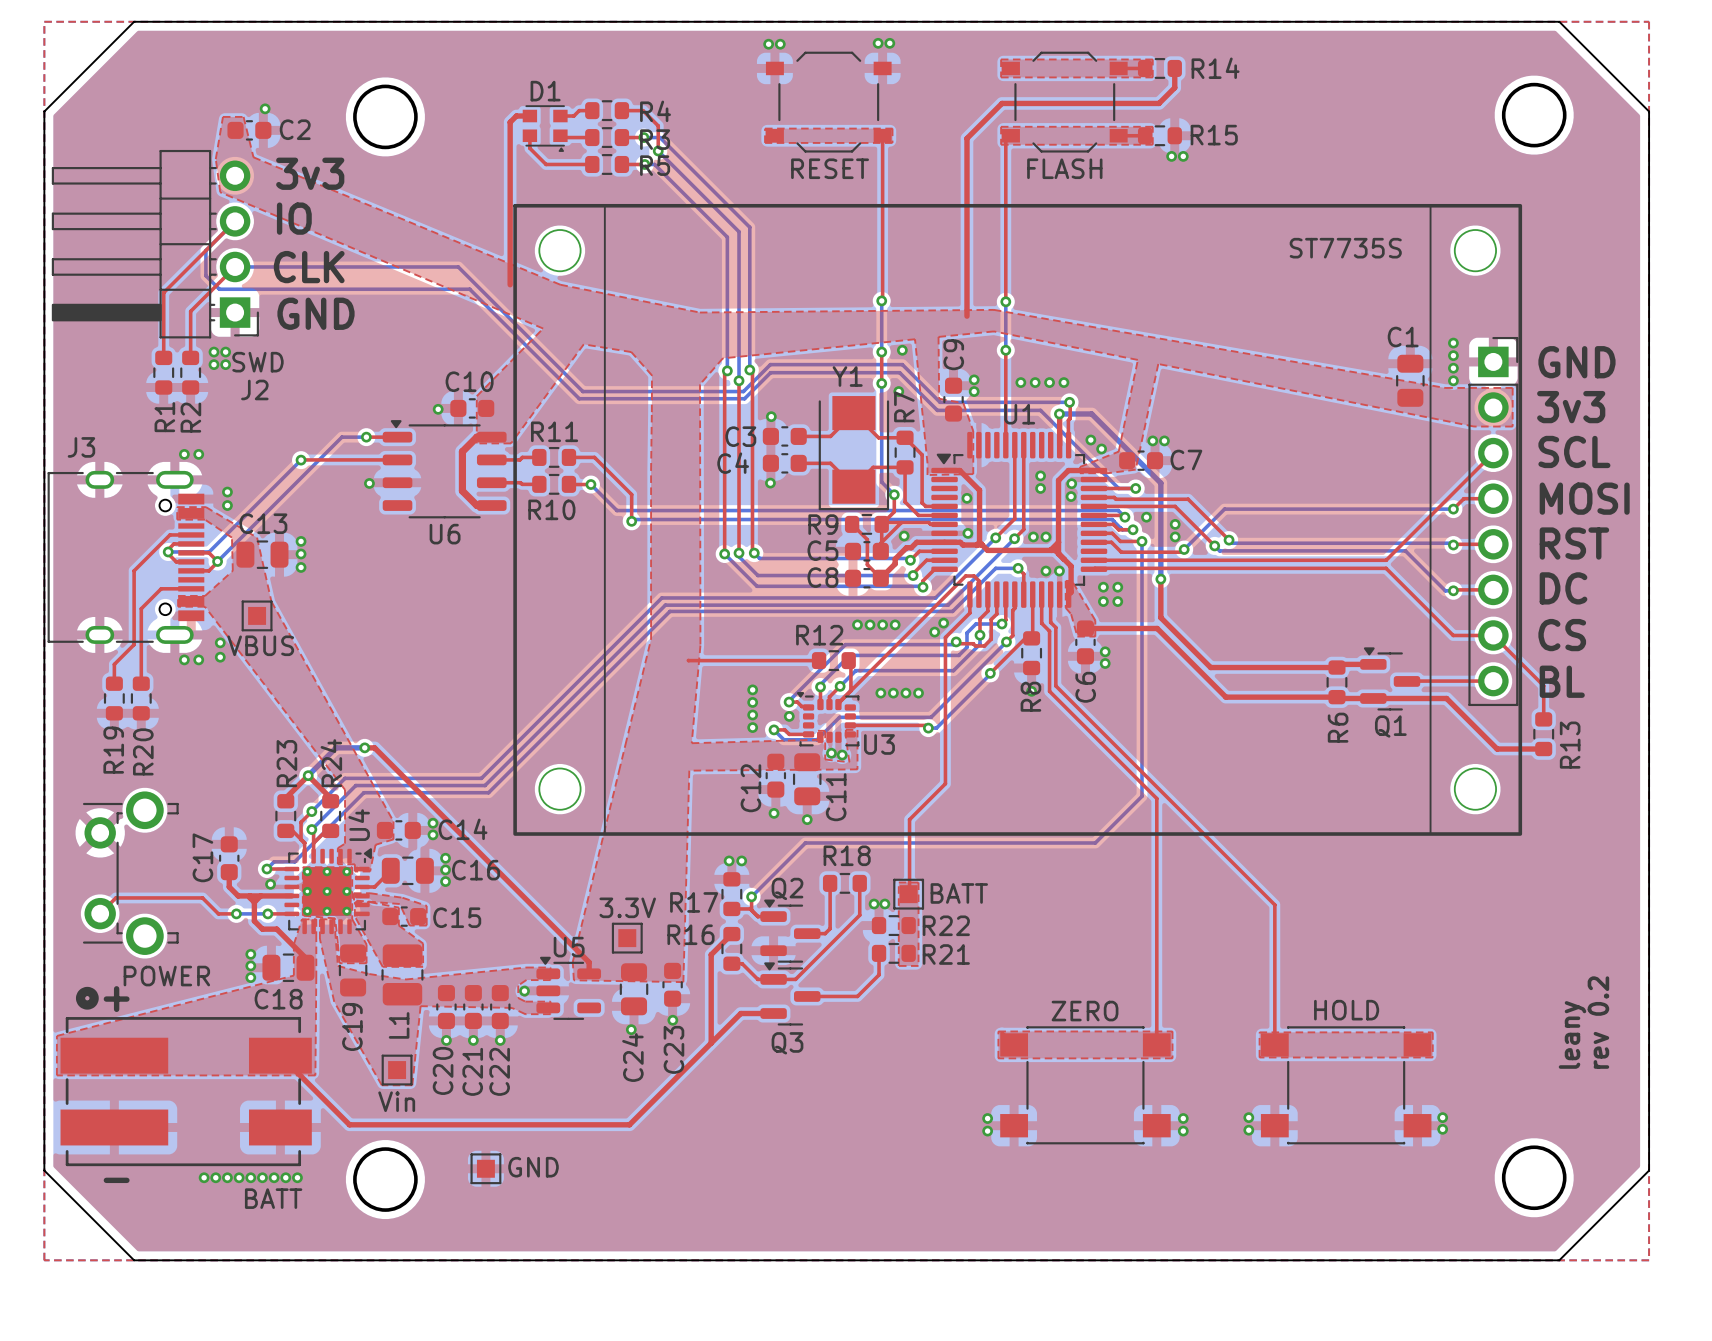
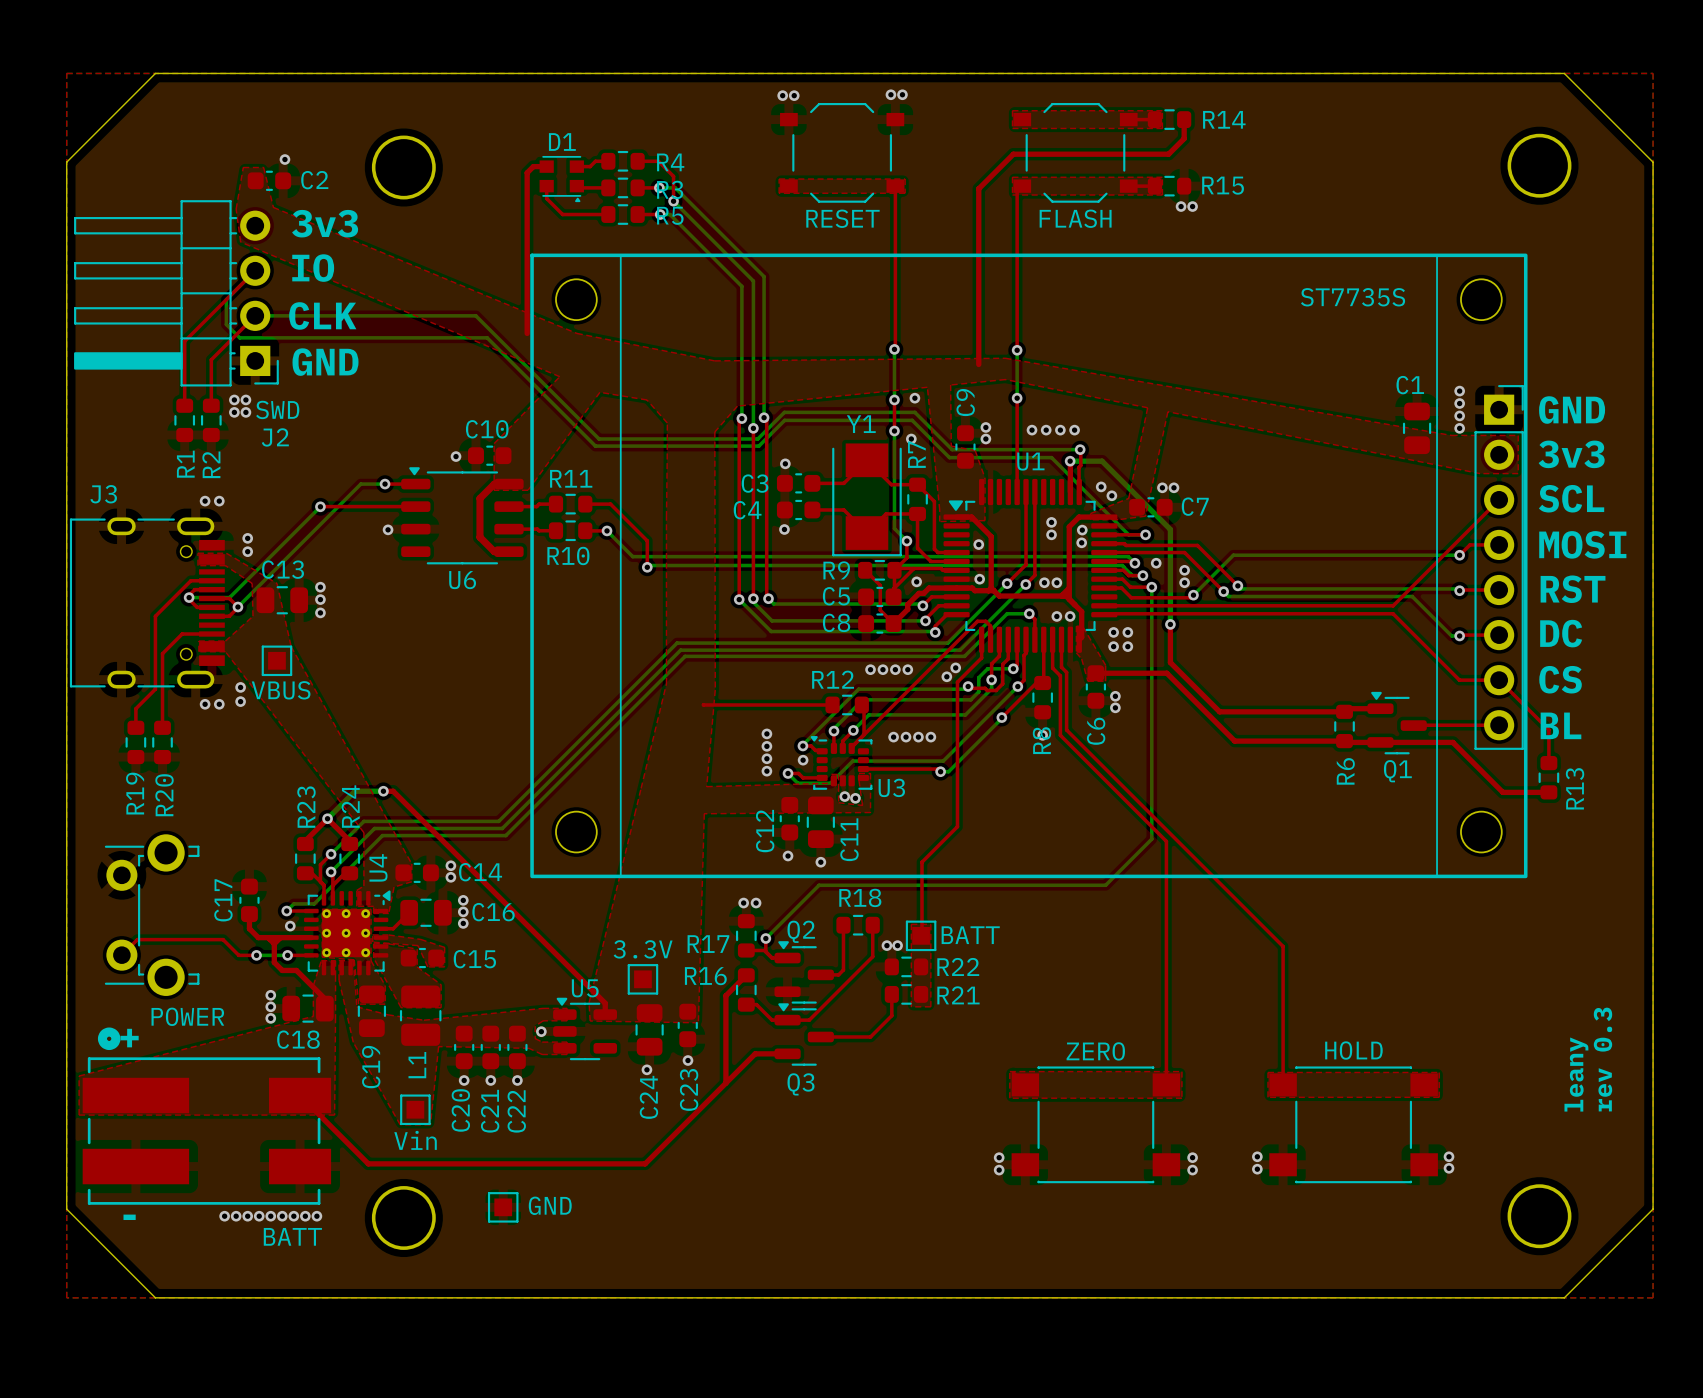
text: rev 0.2 (1598, 1022) -> rev 0.3 (1602, 1059)

